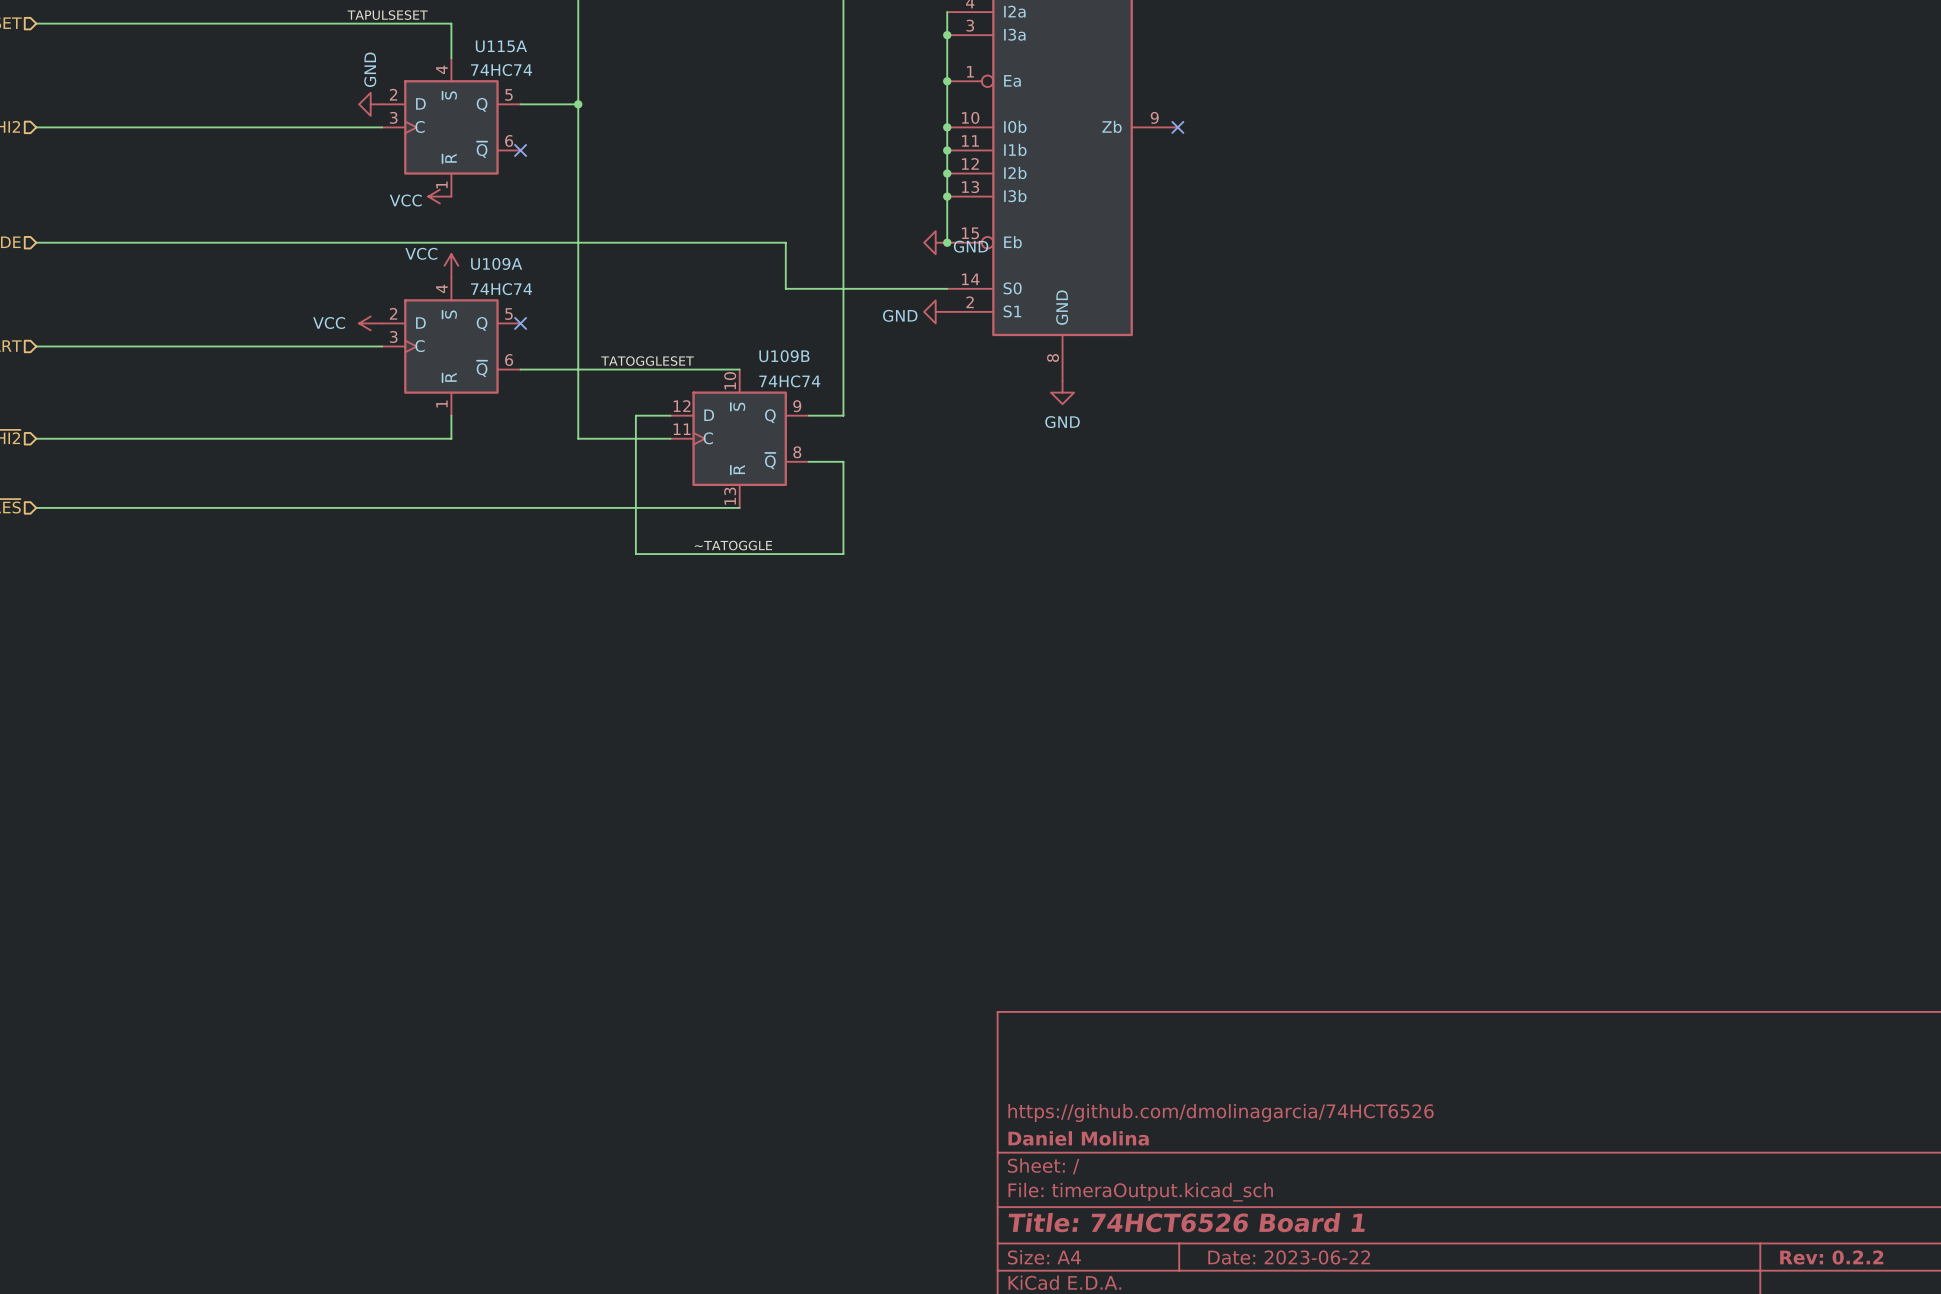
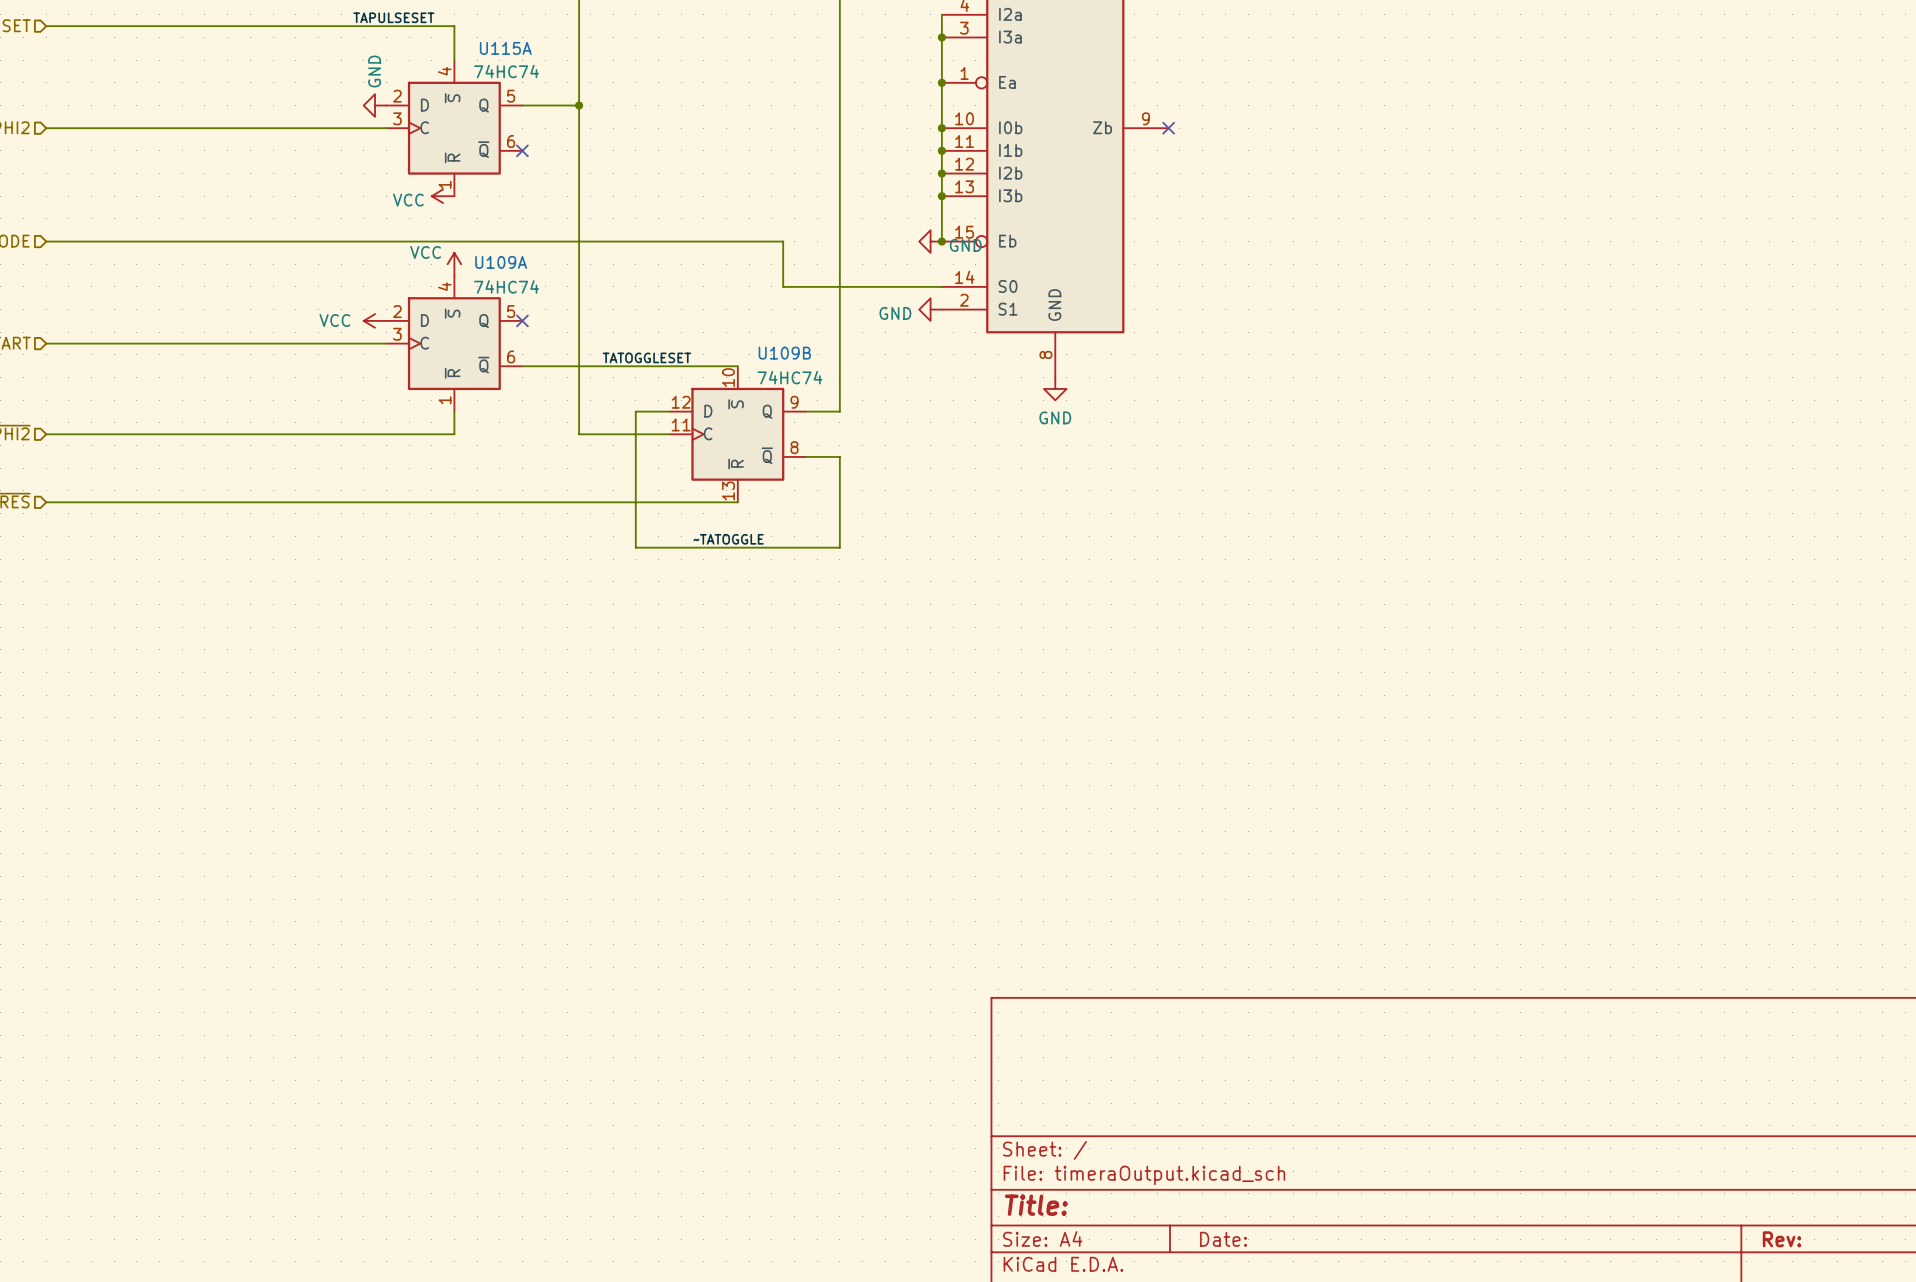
title block: https://github.com/dmolinagarcia/74HCT6526 (1221, 1112) -> none
title block: Daniel Molina (1078, 1138) -> none
title block: Title: 74HCT6526 Board 1 (1186, 1222) -> Title: (1036, 1205)
title block: Date: 2023-06-22 (1289, 1257) -> Date: (1223, 1239)
title block: Rev: 0.2.2 (1831, 1257) -> Rev: (1781, 1239)

